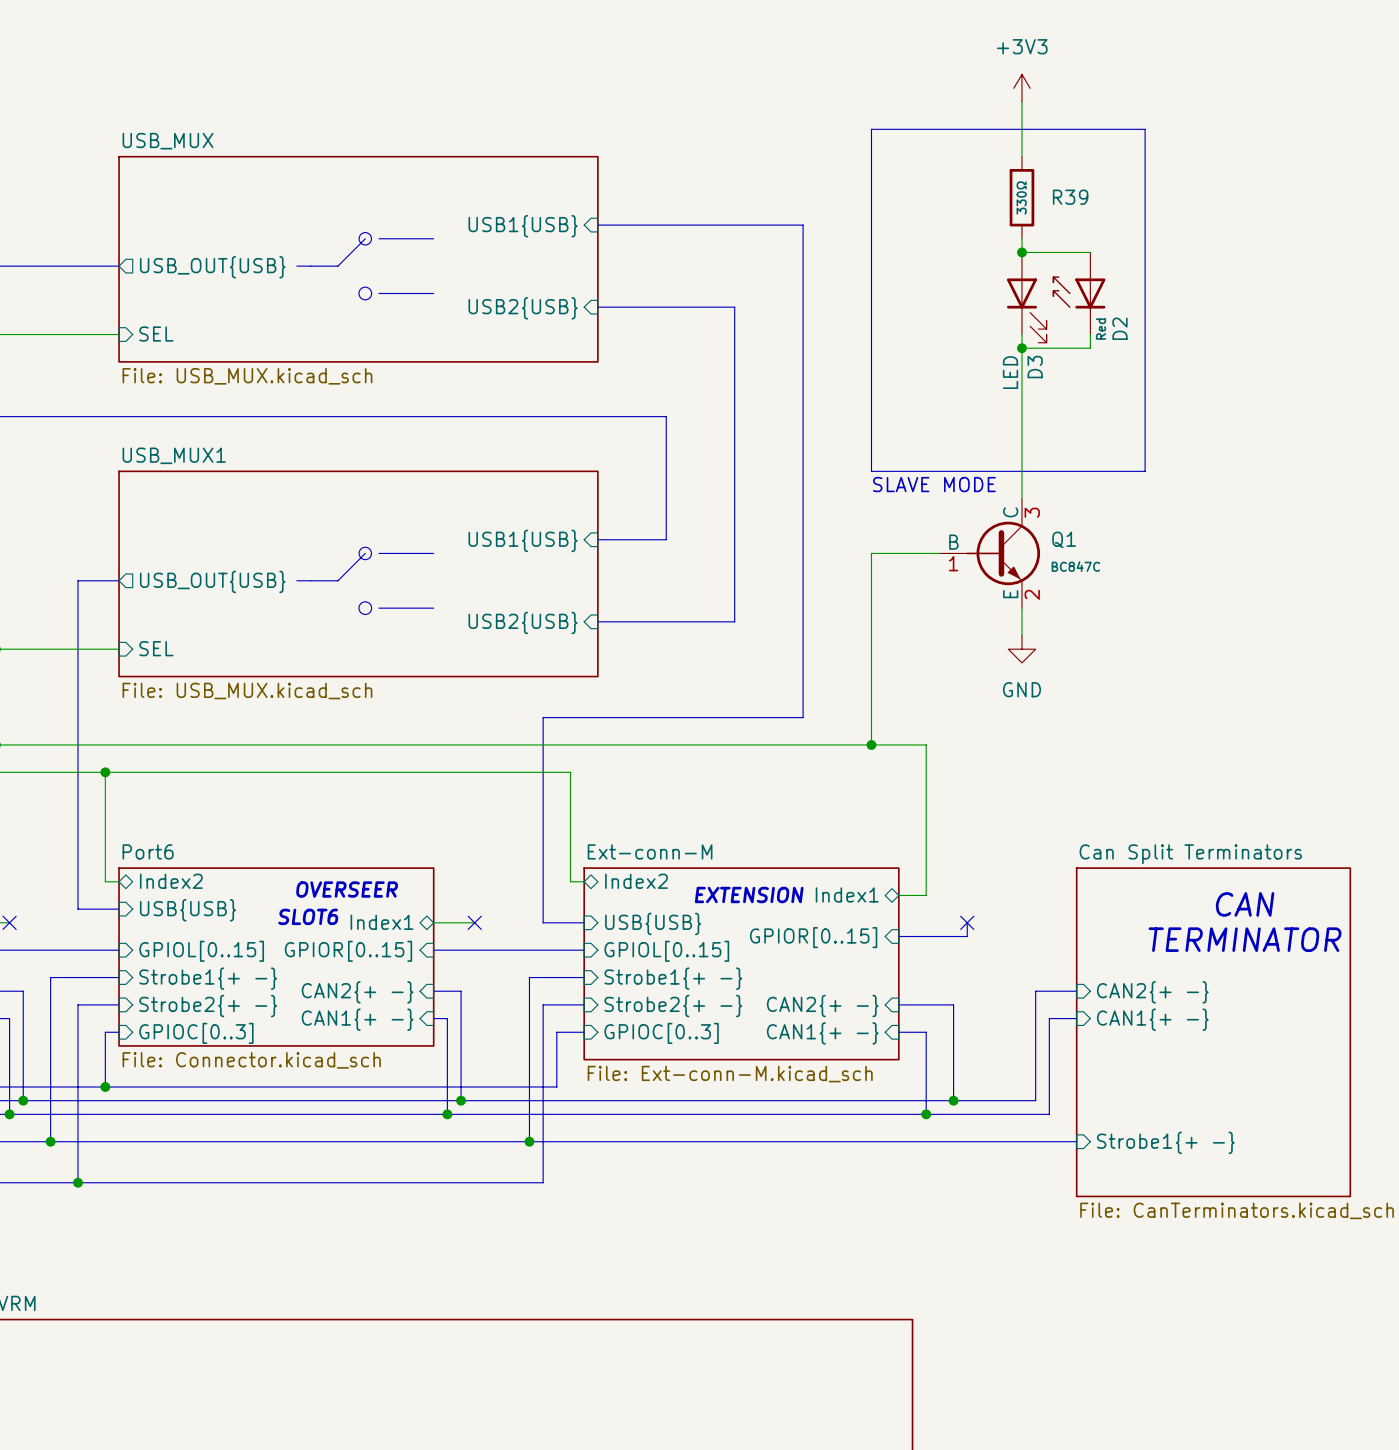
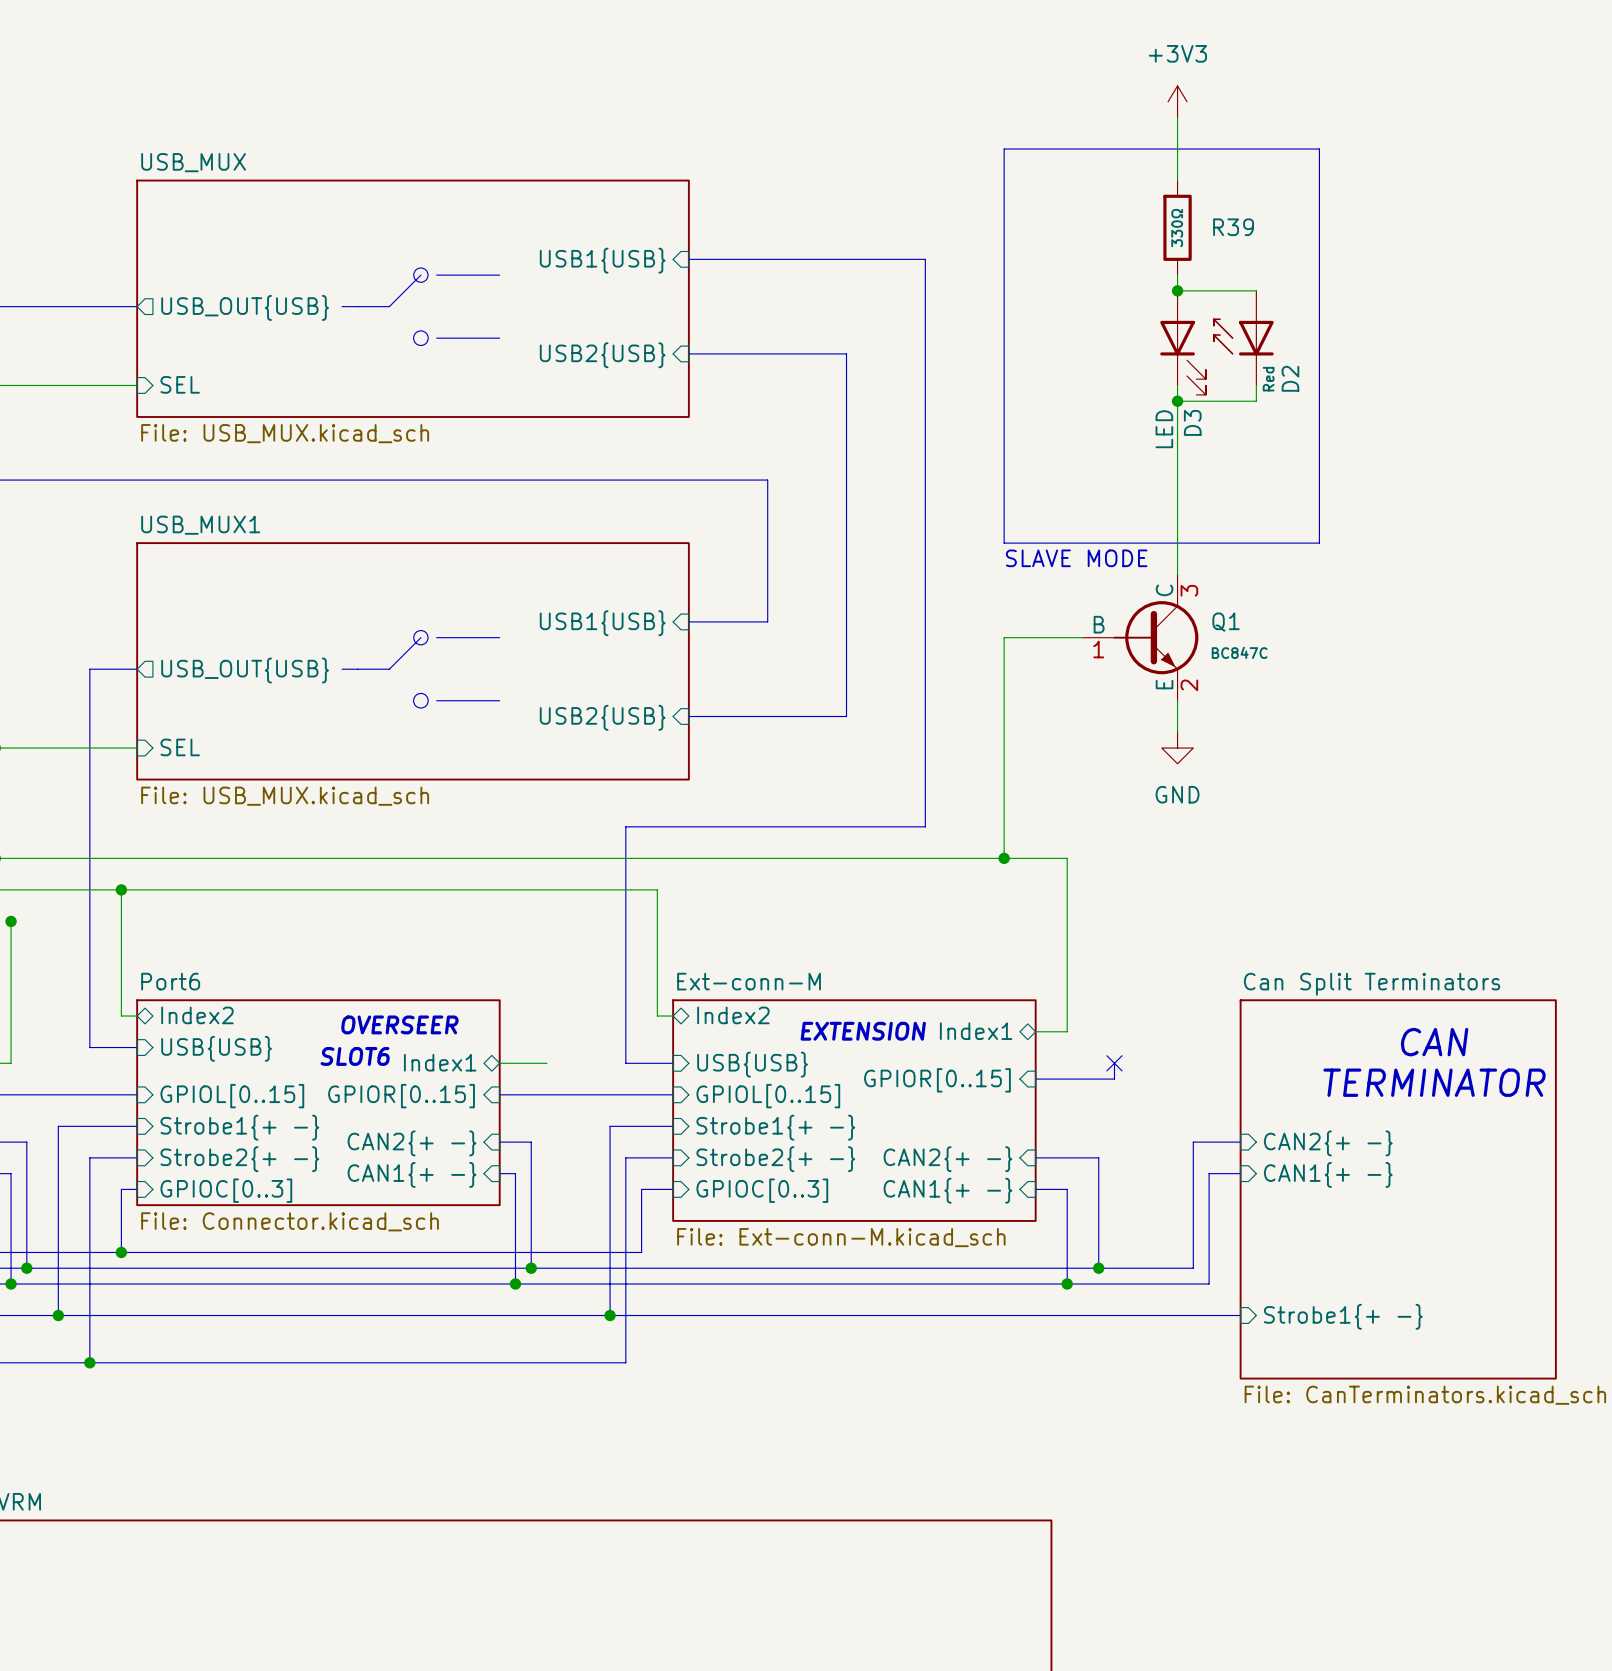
wire: none -> (11, 921) (11, 1063)
junction: none -> (11, 921)
no-connect mark: (9, 922) -> none
no-connect mark: (474, 922) -> none

